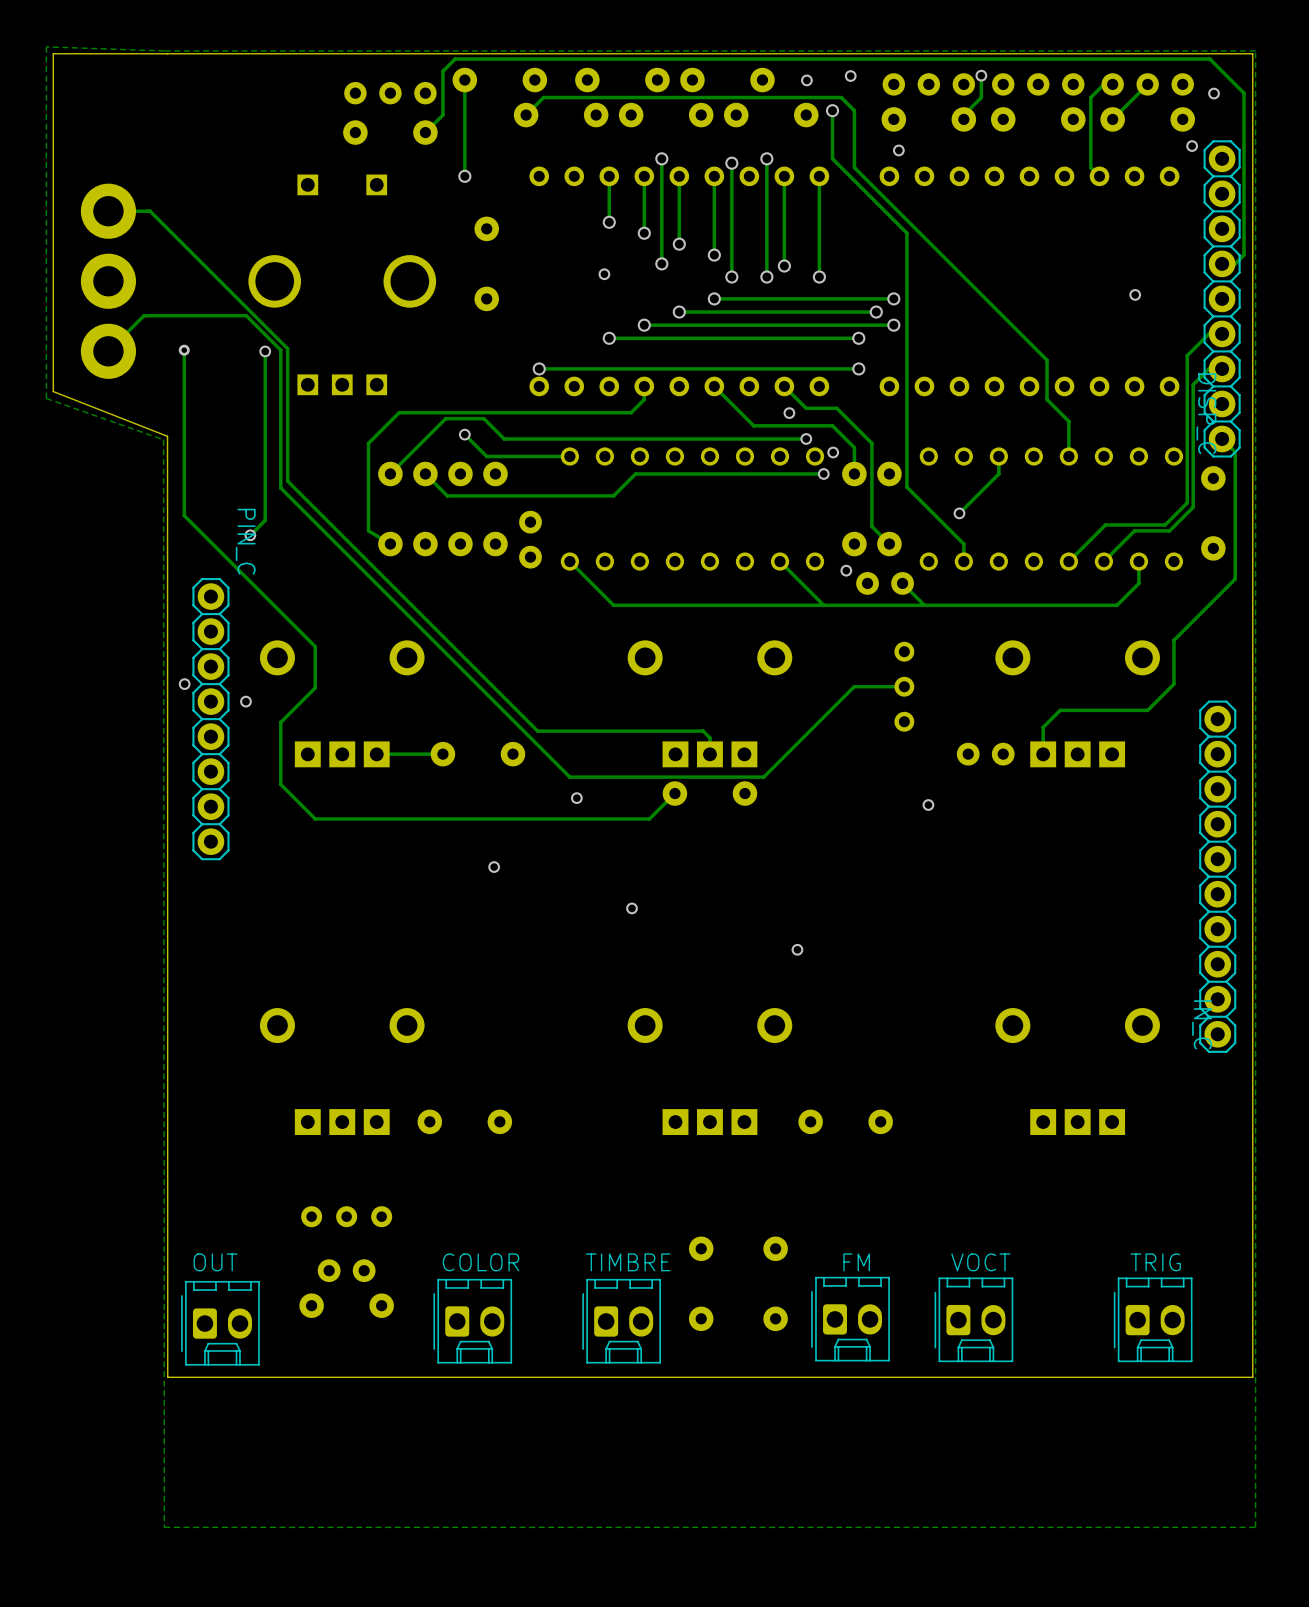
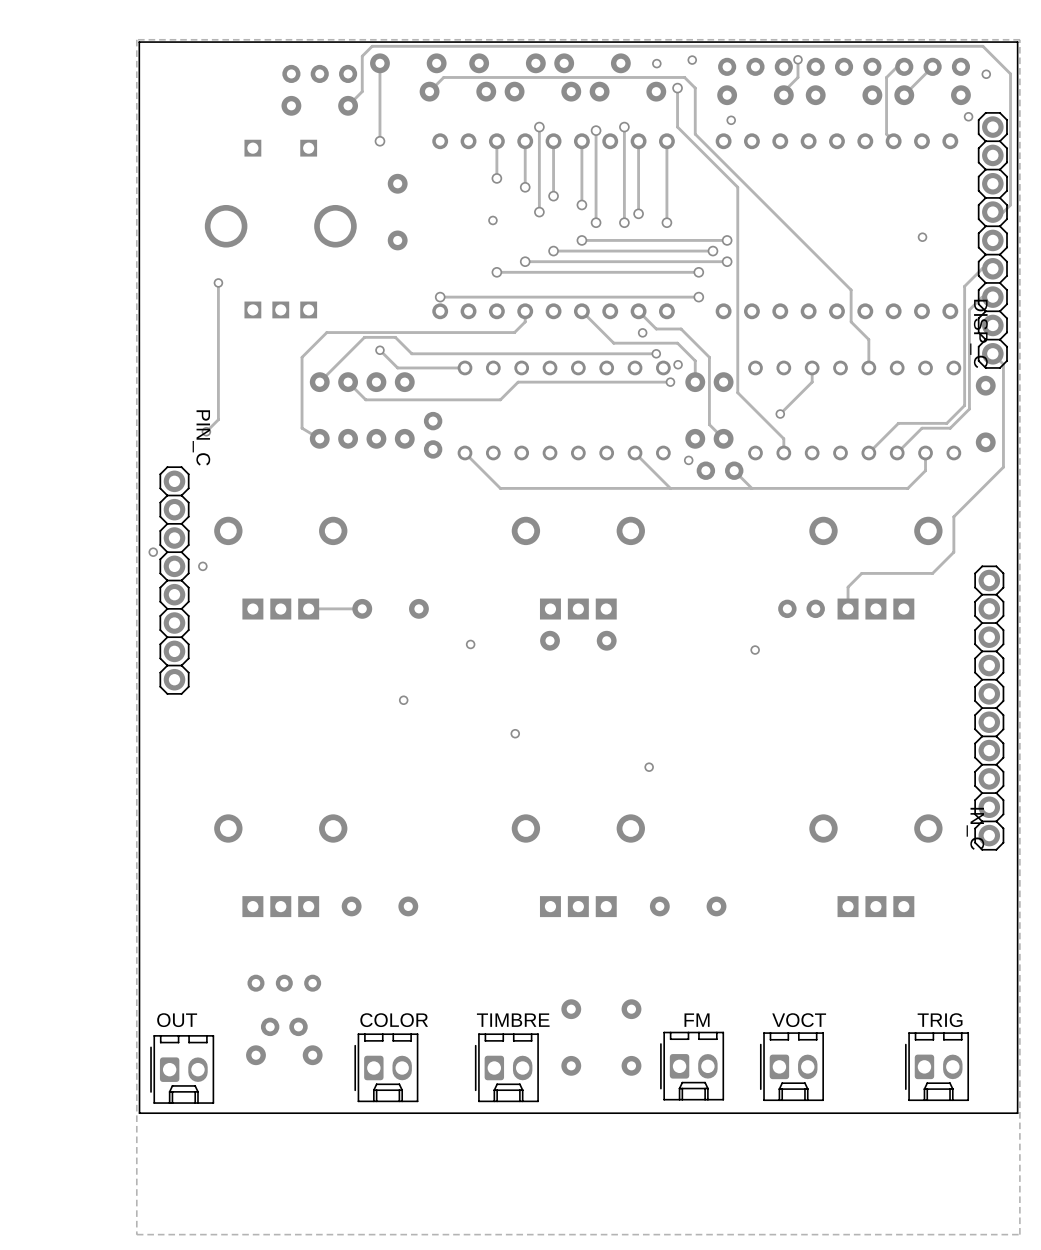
zone outline: (164, 50) (46, 46) (46, 398) (163, 439) (164, 1527) -> (136, 39) (136, 1234)
board edge: (167, 53) (53, 53) (53, 391) (167, 436) -> (139, 42) (139, 351)
track: (108, 211) (150, 211) (287, 348) (287, 481) (537, 731) (703, 731) (709, 737) (709, 754) -> none
part: (108, 281) -> none
track: (184, 350) (184, 515) (315, 646) (315, 687) (280, 722) (280, 784) (315, 818) (649, 818) (674, 793) -> none
via: (184, 350) -> none
track: (108, 351) (144, 315) (246, 315) (280, 350) (280, 488) (569, 777) (763, 777) (854, 686) (904, 686) -> none
part: (904, 686) -> none

